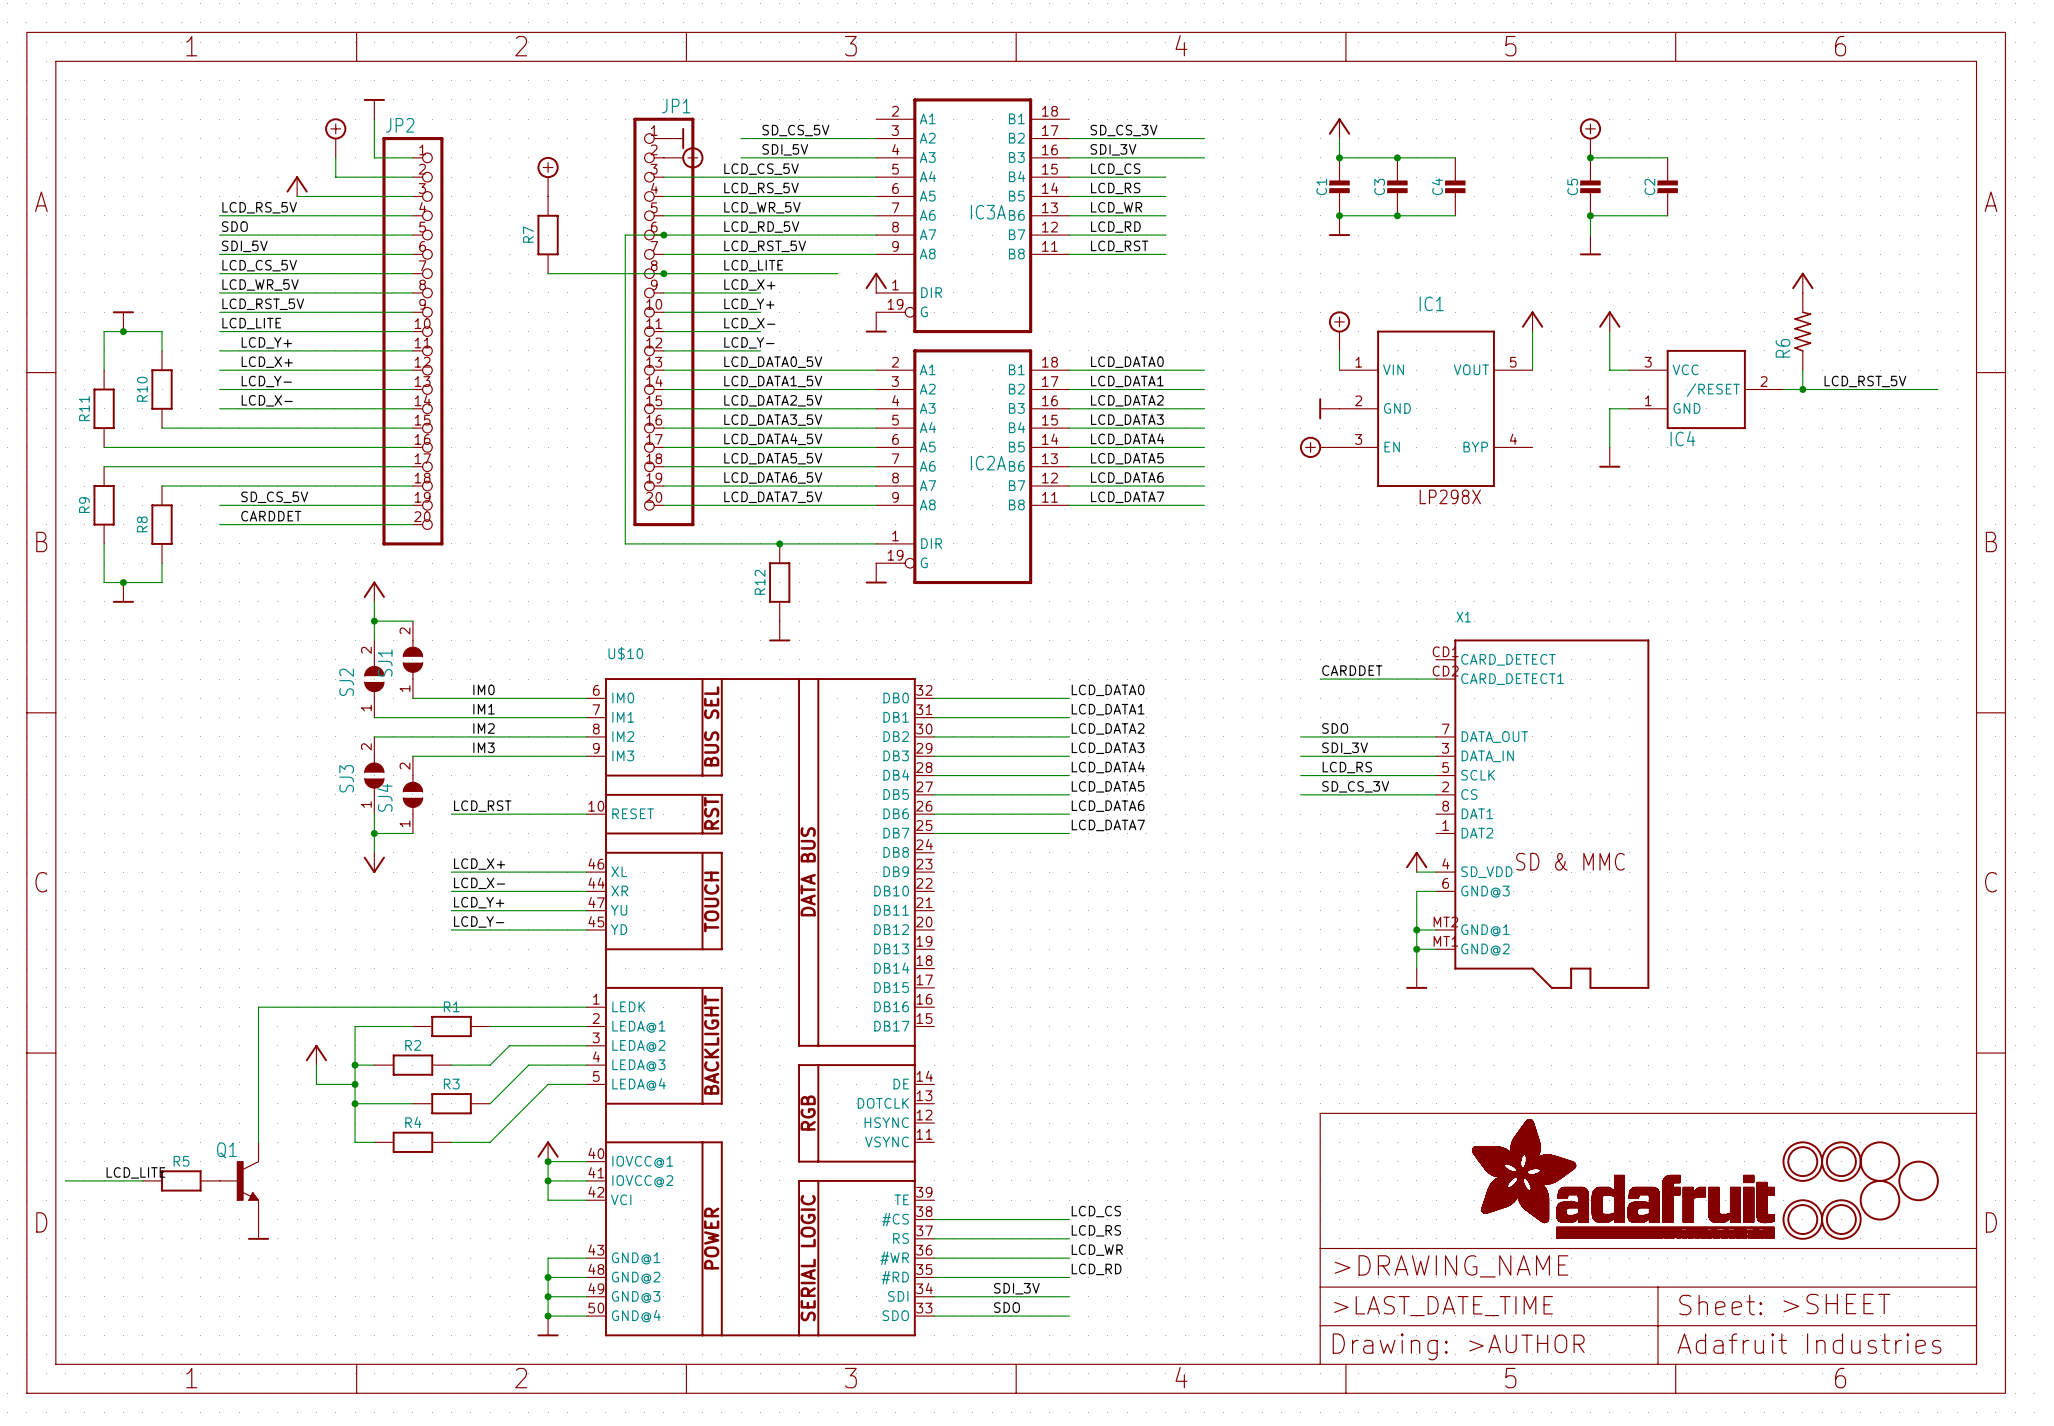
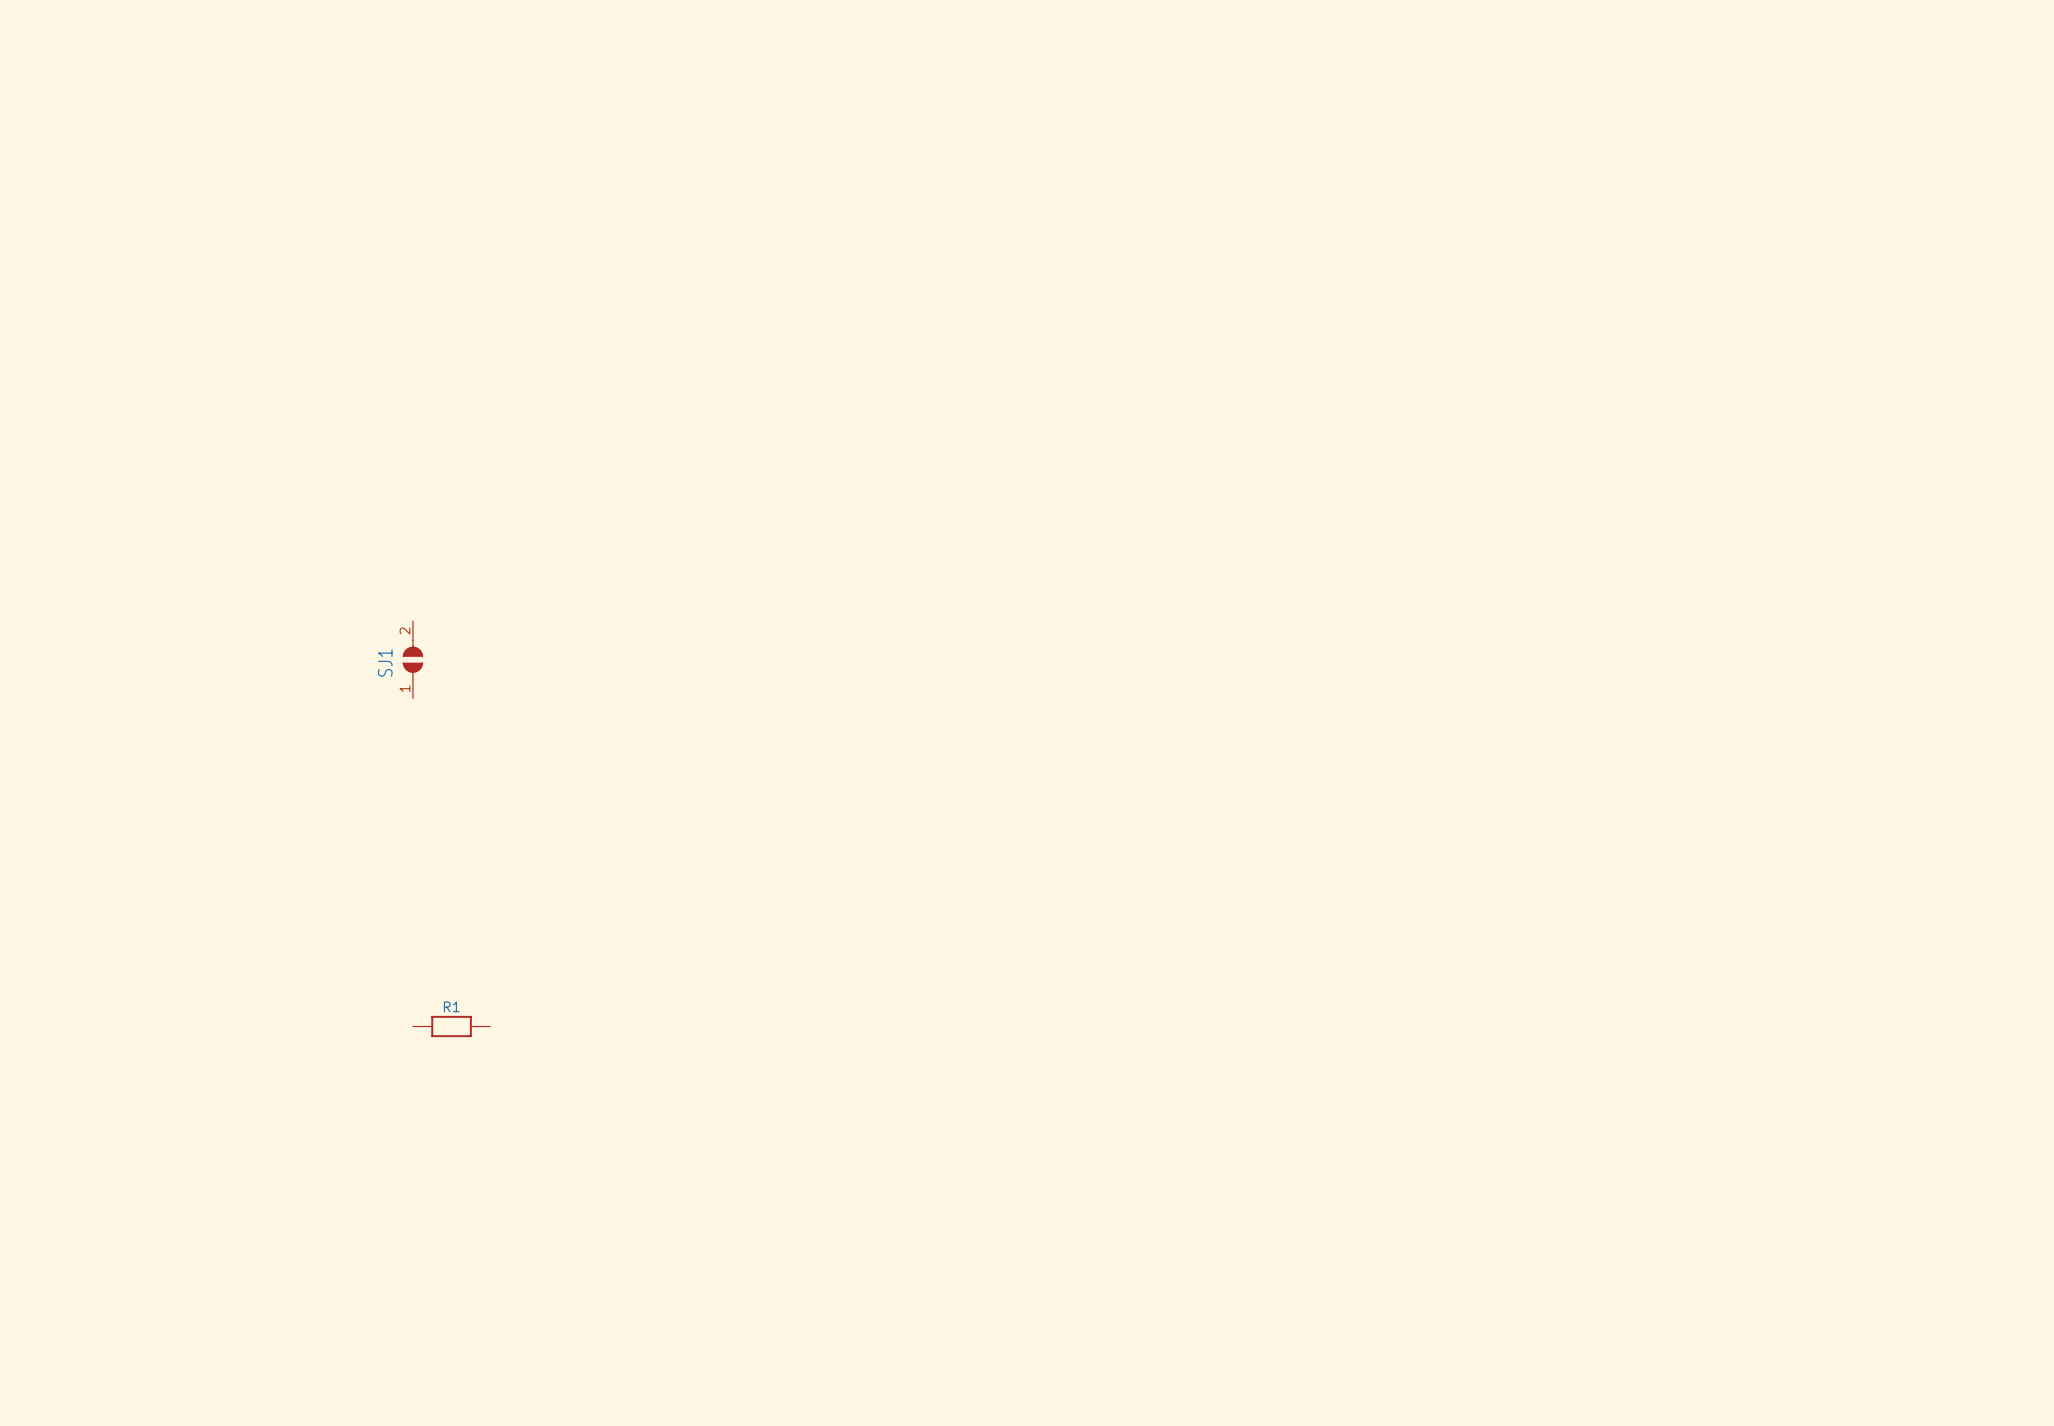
drawing: [26, 32, 2006, 1394] -> none
power symbol: (374, 109) -> none
wire: (374, 119) (374, 157) (412, 157) -> none
power symbol: (1339, 128) -> none
label: SD_CS_5V (795, 130) -> none
label: SD_CS_3V (1124, 130) -> none
power symbol: (335, 138) -> none
power symbol: (674, 138) -> none
wire: (741, 138) (876, 138) -> none
wire: (1069, 138) (1204, 138) -> none
wire: (1339, 138) (1339, 157) (1455, 157) -> none
power symbol: (1590, 138) -> none
label: SDI_5V (785, 149) -> none
label: SDI_3V (1113, 149) -> none
wire: (335, 157) (335, 177) (412, 177) -> none
power symbol: (683, 157) -> none
wire: (741, 157) (876, 157) -> none
wire: (1069, 157) (1204, 157) -> none
junction: (1339, 157) -> none
junction: (1397, 157) -> none
wire: (1590, 157) (1667, 157) -> none
junction: (1590, 157) -> none
label: LCD_CS_5V (761, 169) -> none
label: LCD_CS (1115, 169) -> none
power symbol: (548, 176) -> none
wire: (663, 177) (876, 177) -> none
wire: (1069, 177) (1165, 177) -> none
power symbol: (297, 186) -> none
C1: (1339, 186) -> none
C3: (1397, 186) -> none
C4: (1455, 186) -> none
C5: (1590, 186) -> none
C2: (1667, 186) -> none
label: LCD_RS_5V (761, 188) -> none
label: LCD_RS (1115, 188) -> none
wire: (297, 196) (412, 196) -> none
wire: (663, 196) (876, 196) -> none
wire: (1069, 196) (1165, 196) -> none
label: LCD_RS_5V (259, 207) -> none
label: LCD_WR_5V (762, 207) -> none
label: LCD_WR (1116, 207) -> none
wire: (219, 215) (412, 215) -> none
wire: (663, 215) (876, 215) -> none
IC3A: (972, 215) -> none
wire: (1069, 215) (1165, 215) -> none
wire: (1339, 215) (1455, 215) -> none
junction: (1339, 215) -> none
junction: (1397, 215) -> none
junction: (1590, 215) -> none
wire: (1667, 215) (1590, 215) (1590, 235) -> none
power symbol: (1339, 225) -> none
label: SDO (234, 226) -> none
label: LCD_RD_5V (761, 227) -> none
label: LCD_RD (1115, 227) -> none
wire: (219, 235) (412, 235) -> none
R7: (548, 235) -> none
junction: (663, 235) -> none
wire: (876, 235) (625, 235) (625, 543) (876, 543) -> none
wire: (1069, 235) (1165, 235) -> none
power symbol: (1590, 245) -> none
label: SDI_5V (244, 246) -> none
label: LCD_RST_5V (765, 246) -> none
label: LCD_RST (1119, 246) -> none
wire: (219, 254) (412, 254) -> none
wire: (663, 254) (876, 254) -> none
wire: (1069, 254) (1165, 254) -> none
label: LCD_CS_5V (259, 265) -> none
label: LCD_LITE (753, 265) -> none
wire: (219, 273) (412, 273) -> none
wire: (548, 273) (837, 273) -> none
junction: (663, 273) -> none
power symbol: (876, 282) -> none
power symbol: (1802, 282) -> none
label: LCD_WR_5V (260, 284) -> none
label: LCD_X+ (749, 284) -> none
wire: (219, 292) (412, 292) -> none
wire: (663, 292) (760, 292) -> none
label: LCD_RST_5V (263, 304) -> none
label: LCD_Y+ (749, 304) -> none
wire: (219, 312) (412, 312) -> none
wire: (663, 312) (760, 312) -> none
power symbol: (123, 321) -> none
JP1: (663, 321) -> none
power symbol: (1532, 321) -> none
power symbol: (1609, 321) -> none
power symbol: (876, 322) -> none
label: LCD_LITE (251, 323) -> none
label: LCD_X- (749, 323) -> none
junction: (123, 331) -> none
wire: (219, 331) (412, 331) -> none
wire: (663, 331) (760, 331) -> none
power symbol: (1339, 331) -> none
wire: (1532, 331) (1532, 370) -> none
wire: (1609, 331) (1609, 370) (1629, 370) -> none
R6: (1802, 331) -> none
JP2: (412, 341) -> none
label: LCD_Y+ (266, 342) -> none
label: LCD_Y- (749, 342) -> none
wire: (162, 350) (162, 331) (104, 331) (104, 370) -> none
wire: (219, 350) (412, 350) -> none
wire: (663, 350) (760, 350) -> none
wire: (1339, 350) (1339, 370) -> none
label: LCD_X+ (267, 362) -> none
label: LCD_DATA0_5V (773, 362) -> none
label: LCD_DATA0 (1127, 362) -> none
wire: (219, 370) (412, 370) -> none
wire: (663, 370) (876, 370) -> none
wire: (1069, 370) (1204, 370) -> none
wire: (1802, 370) (1802, 389) -> none
label: LCD_Y- (266, 381) -> none
label: LCD_DATA1_5V (773, 381) -> none
label: LCD_DATA1 (1127, 381) -> none
label: LCD_RST_5V (1865, 381) -> none
R10: (162, 389) -> none
wire: (219, 389) (412, 389) -> none
wire: (663, 389) (876, 389) -> none
wire: (1069, 389) (1204, 389) -> none
IC4: (1706, 389) -> none
wire: (1783, 389) (1937, 389) -> none
junction: (1802, 389) -> none
label: LCD_X- (267, 400) -> none
label: LCD_DATA2_5V (773, 400) -> none
label: LCD_DATA2 (1127, 400) -> none
R11: (104, 408) -> none
wire: (219, 408) (412, 408) -> none
wire: (663, 408) (876, 408) -> none
wire: (1069, 408) (1204, 408) -> none
power symbol: (1329, 408) -> none
IC1: (1436, 408) -> none
wire: (1629, 408) (1609, 408) (1609, 447) -> none
label: LCD_DATA3_5V (773, 420) -> none
label: LCD_DATA3 (1127, 420) -> none
wire: (162, 428) (412, 428) -> none
wire: (663, 428) (876, 428) -> none
wire: (1069, 428) (1204, 428) -> none
label: LCD_DATA4_5V (773, 439) -> none
label: LCD_DATA4 (1127, 439) -> none
wire: (104, 447) (412, 447) -> none
wire: (663, 447) (876, 447) -> none
wire: (1069, 447) (1204, 447) -> none
power symbol: (1319, 447) -> none
power symbol: (1609, 457) -> none
label: LCD_DATA5_5V (773, 458) -> none
label: LCD_DATA5 (1127, 458) -> none
wire: (104, 466) (412, 466) -> none
wire: (663, 466) (876, 466) -> none
IC2A: (972, 466) -> none
wire: (1069, 466) (1204, 466) -> none
label: LCD_DATA6_5V (773, 478) -> none
label: LCD_DATA6 (1127, 478) -> none
wire: (162, 486) (412, 486) -> none
wire: (663, 486) (876, 486) -> none
wire: (1069, 486) (1204, 486) -> none
label: SD_CS_5V (274, 497) -> none
label: LCD_DATA7_5V (773, 497) -> none
label: LCD_DATA7 (1127, 497) -> none
R9: (104, 505) -> none
wire: (219, 505) (412, 505) -> none
wire: (663, 505) (876, 505) -> none
wire: (1069, 505) (1204, 505) -> none
label: CARDDET (271, 516) -> none
R8: (162, 524) -> none
wire: (219, 524) (412, 524) -> none
wire: (104, 543) (104, 582) (162, 582) (162, 563) -> none
junction: (779, 543) -> none
power symbol: (876, 573) -> none
junction: (123, 582) -> none
R12: (779, 582) -> none
power symbol: (374, 591) -> none
power symbol: (123, 592) -> none
wire: (374, 601) (374, 640) -> none
wire: (374, 621) (412, 621) -> none
junction: (374, 621) -> none
power symbol: (779, 631) -> none
label: CARDDET (1352, 670) -> none
SJ2: (374, 679) -> none
wire: (1320, 679) (1436, 679) -> none
label: IM0 (484, 689) -> none
label: LCD_DATA0 (1108, 690) -> none
wire: (412, 698) (586, 698) -> none
wire: (934, 698) (1069, 698) -> none
label: IM1 (484, 709) -> none
label: LCD_DATA1 (1108, 709) -> none
wire: (374, 717) (586, 717) -> none
wire: (934, 717) (1069, 717) -> none
label: IM2 (484, 728) -> none
label: LCD_DATA2 (1108, 728) -> none
label: SDO (1335, 728) -> none
wire: (374, 736) (586, 736) -> none
wire: (934, 736) (1069, 736) -> none
wire: (1300, 736) (1436, 736) -> none
label: IM3 (484, 747) -> none
label: LCD_DATA3 (1108, 748) -> none
label: SDI_3V (1345, 748) -> none
wire: (412, 756) (586, 756) -> none
wire: (934, 756) (1069, 756) -> none
wire: (1300, 756) (1436, 756) -> none
label: LCD_DATA4 (1108, 767) -> none
label: LCD_RS (1347, 767) -> none
SJ3: (374, 775) -> none
wire: (934, 775) (1069, 775) -> none
wire: (1300, 775) (1436, 775) -> none
label: LCD_DATA5 (1108, 786) -> none
label: SD_CS_3V (1355, 786) -> none
SJ4: (412, 794) -> none
wire: (934, 794) (1069, 794) -> none
wire: (1300, 794) (1436, 794) -> none
label: LCD_RST (482, 806) -> none
label: LCD_DATA6 (1108, 806) -> none
wire: (374, 814) (374, 852) -> none
wire: (451, 814) (586, 814) -> none
wire: (934, 814) (1069, 814) -> none
X1: (1542, 814) -> none
label: LCD_DATA7 (1108, 825) -> none
wire: (374, 833) (412, 833) -> none
junction: (374, 833) -> none
wire: (934, 833) (1069, 833) -> none
power symbol: (1416, 861) -> none
power symbol: (374, 862) -> none
label: LCD_X+ (479, 864) -> none
wire: (451, 872) (586, 872) -> none
wire: (1416, 872) (1436, 872) -> none
label: LCD_X- (479, 883) -> none
wire: (451, 891) (586, 891) -> none
wire: (1436, 891) (1416, 891) (1416, 968) -> none
label: LCD_Y+ (479, 902) -> none
wire: (451, 910) (586, 910) -> none
label: LCD_Y- (479, 921) -> none
wire: (451, 929) (586, 929) -> none
wire: (1416, 929) (1436, 929) -> none
junction: (1416, 929) -> none
wire: (1416, 949) (1436, 949) -> none
junction: (1416, 949) -> none
power symbol: (1416, 978) -> none
wire: (586, 1007) (258, 1007) (258, 1142) -> none
U$10: (760, 1007) -> none
wire: (412, 1026) (355, 1026) (355, 1142) (374, 1142) -> none
wire: (490, 1026) (586, 1026) -> none
wire: (586, 1045) (509, 1045) (490, 1065) (451, 1065) -> none
power symbol: (316, 1054) -> none
wire: (316, 1065) (316, 1084) (355, 1084) -> none
wire: (355, 1065) (374, 1065) -> none
junction: (355, 1065) -> none
R2: (412, 1065) -> none
wire: (586, 1065) (528, 1065) (490, 1103) -> none
junction: (355, 1084) -> none
wire: (586, 1084) (548, 1084) (490, 1142) (451, 1142) -> none
wire: (355, 1103) (412, 1103) -> none
junction: (355, 1103) -> none
R3: (451, 1103) -> none
R4: (412, 1142) -> none
power symbol: (548, 1151) -> none
junction: (548, 1161) -> none
wire: (586, 1161) (548, 1161) (548, 1200) (586, 1200) -> none
part: (1802, 1161) -> none
part: (1841, 1161) -> none
part: (1880, 1161) -> none
label: LCD_LITE (135, 1172) -> none
wire: (65, 1180) (142, 1180) -> none
R5: (181, 1180) -> none
Q1: (239, 1180) -> none
wire: (548, 1180) (586, 1180) -> none
junction: (548, 1180) -> none
part: (1918, 1180) -> none
part: (1880, 1200) -> none
label: LCD_CS (1096, 1211) -> none
wire: (934, 1219) (1069, 1219) -> none
part: (1802, 1219) -> none
part: (1841, 1219) -> none
power symbol: (258, 1229) -> none
label: LCD_RS (1096, 1230) -> none
wire: (934, 1238) (1069, 1238) -> none
label: LCD_WR (1097, 1250) -> none
wire: (586, 1258) (548, 1258) (548, 1316) (586, 1316) -> none
wire: (934, 1258) (1069, 1258) -> none
label: LCD_RD (1096, 1269) -> none
wire: (548, 1277) (586, 1277) -> none
junction: (548, 1277) -> none
wire: (934, 1277) (1069, 1277) -> none
label: SDI_3V (1016, 1288) -> none
wire: (548, 1296) (586, 1296) -> none
junction: (548, 1296) -> none
wire: (934, 1296) (1069, 1296) -> none
label: SDO (1007, 1307) -> none
junction: (548, 1316) -> none
wire: (934, 1316) (1069, 1316) -> none
power symbol: (548, 1326) -> none

